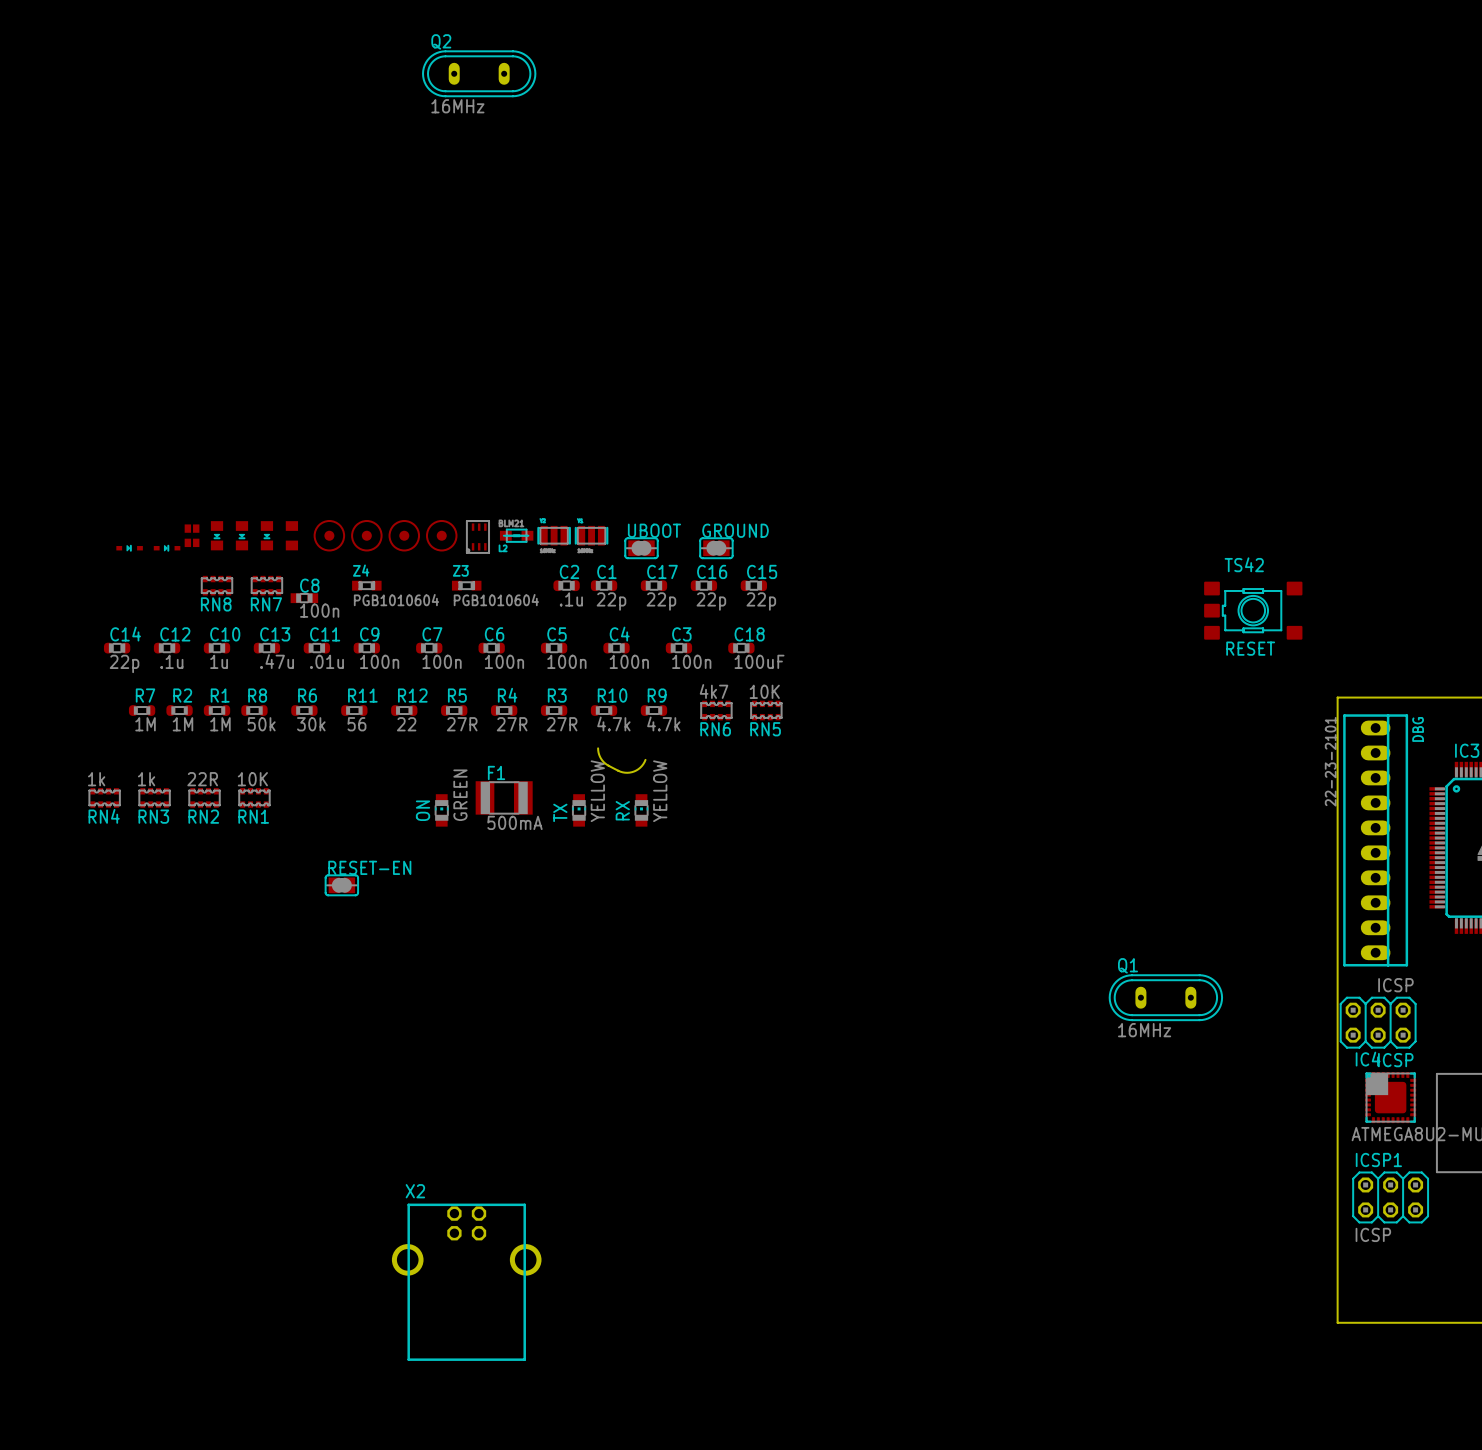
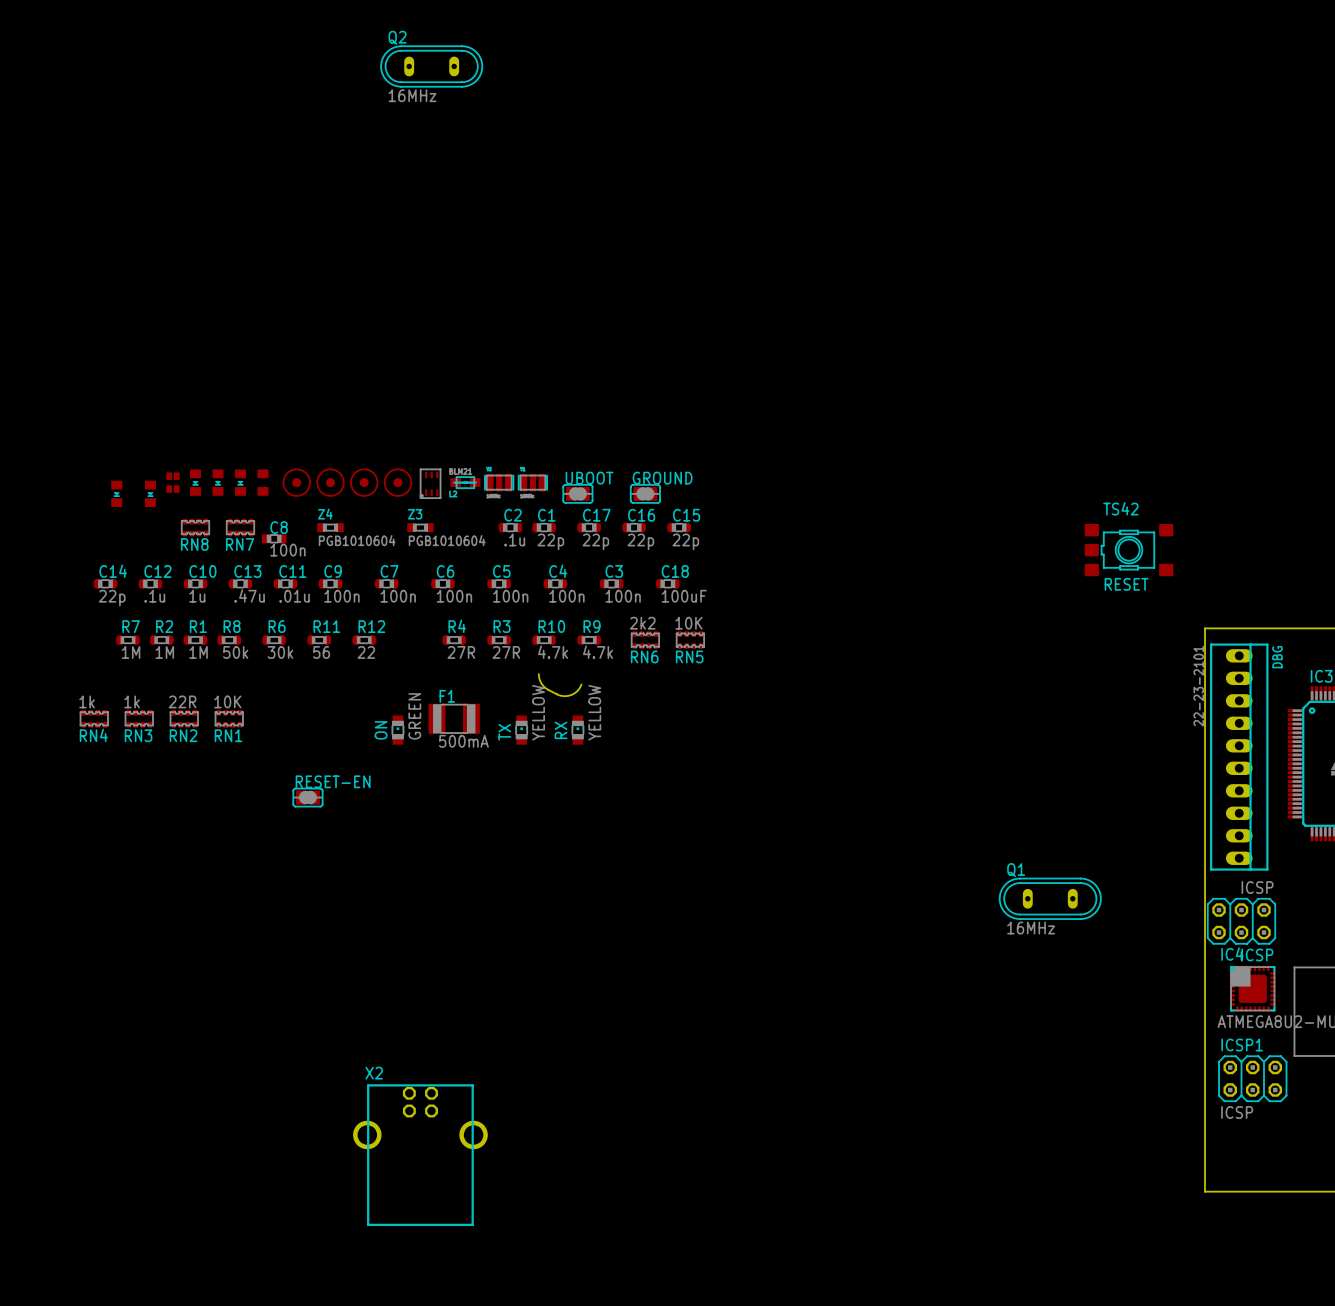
part footprint: [116, 545, 143, 552] -> [111, 480, 123, 508]
part footprint: [153, 545, 181, 552] -> [144, 480, 157, 508]
RN6 value: 4k7 (714, 691) -> 2k2 (642, 623)
R5: 27R (454, 710) -> none

